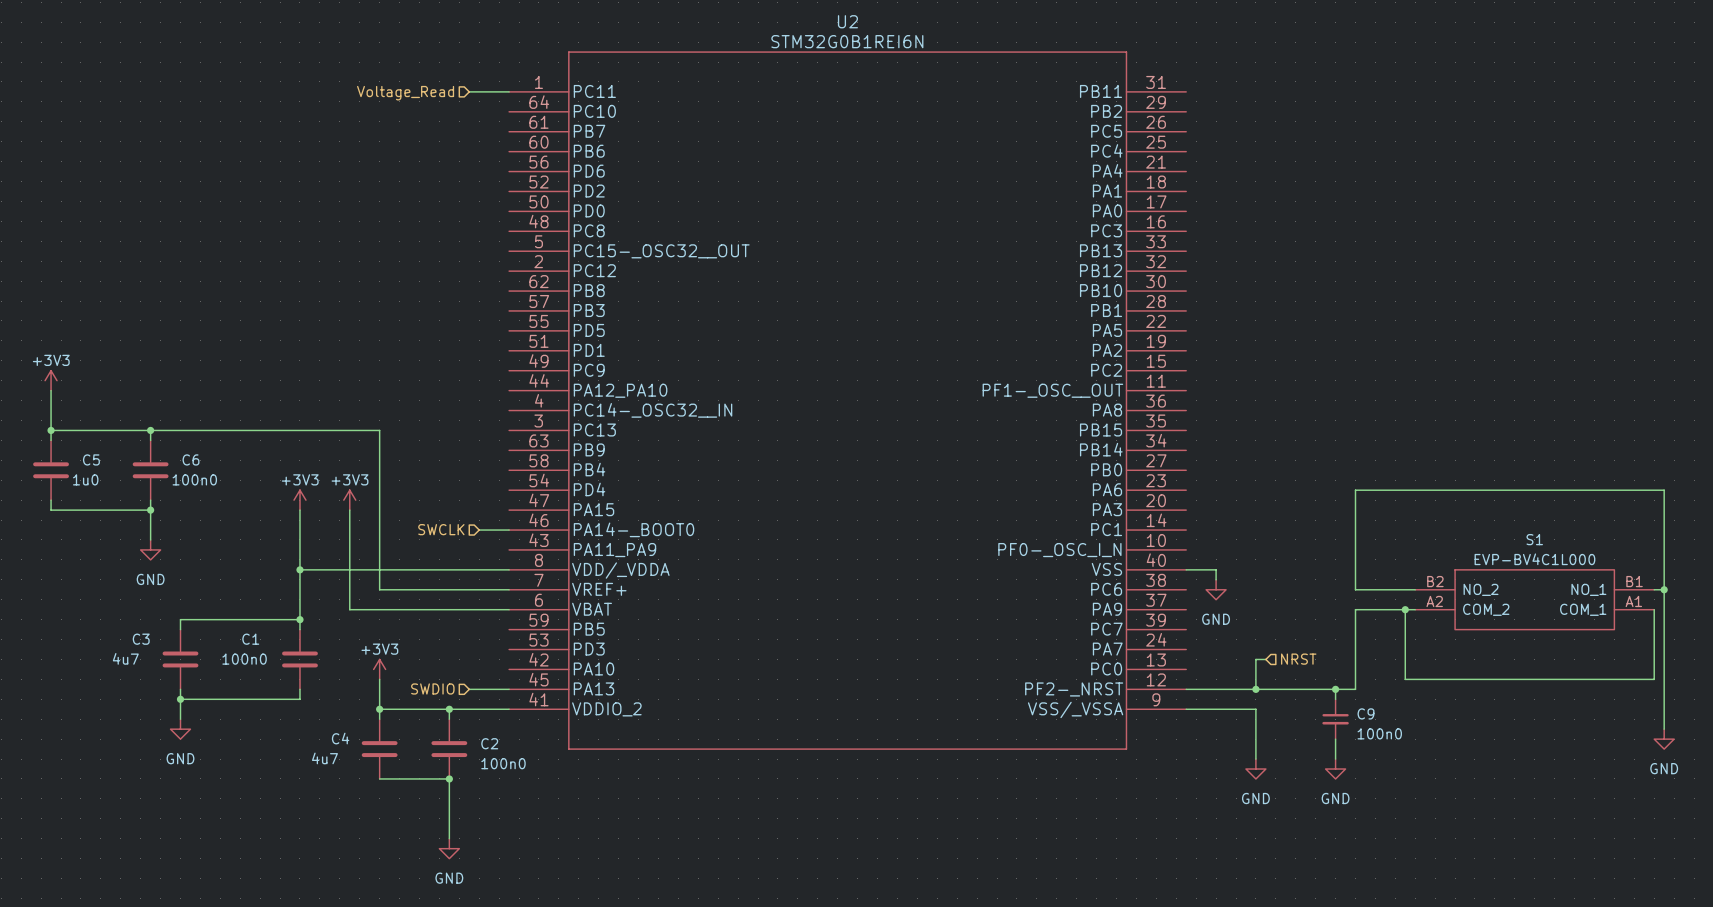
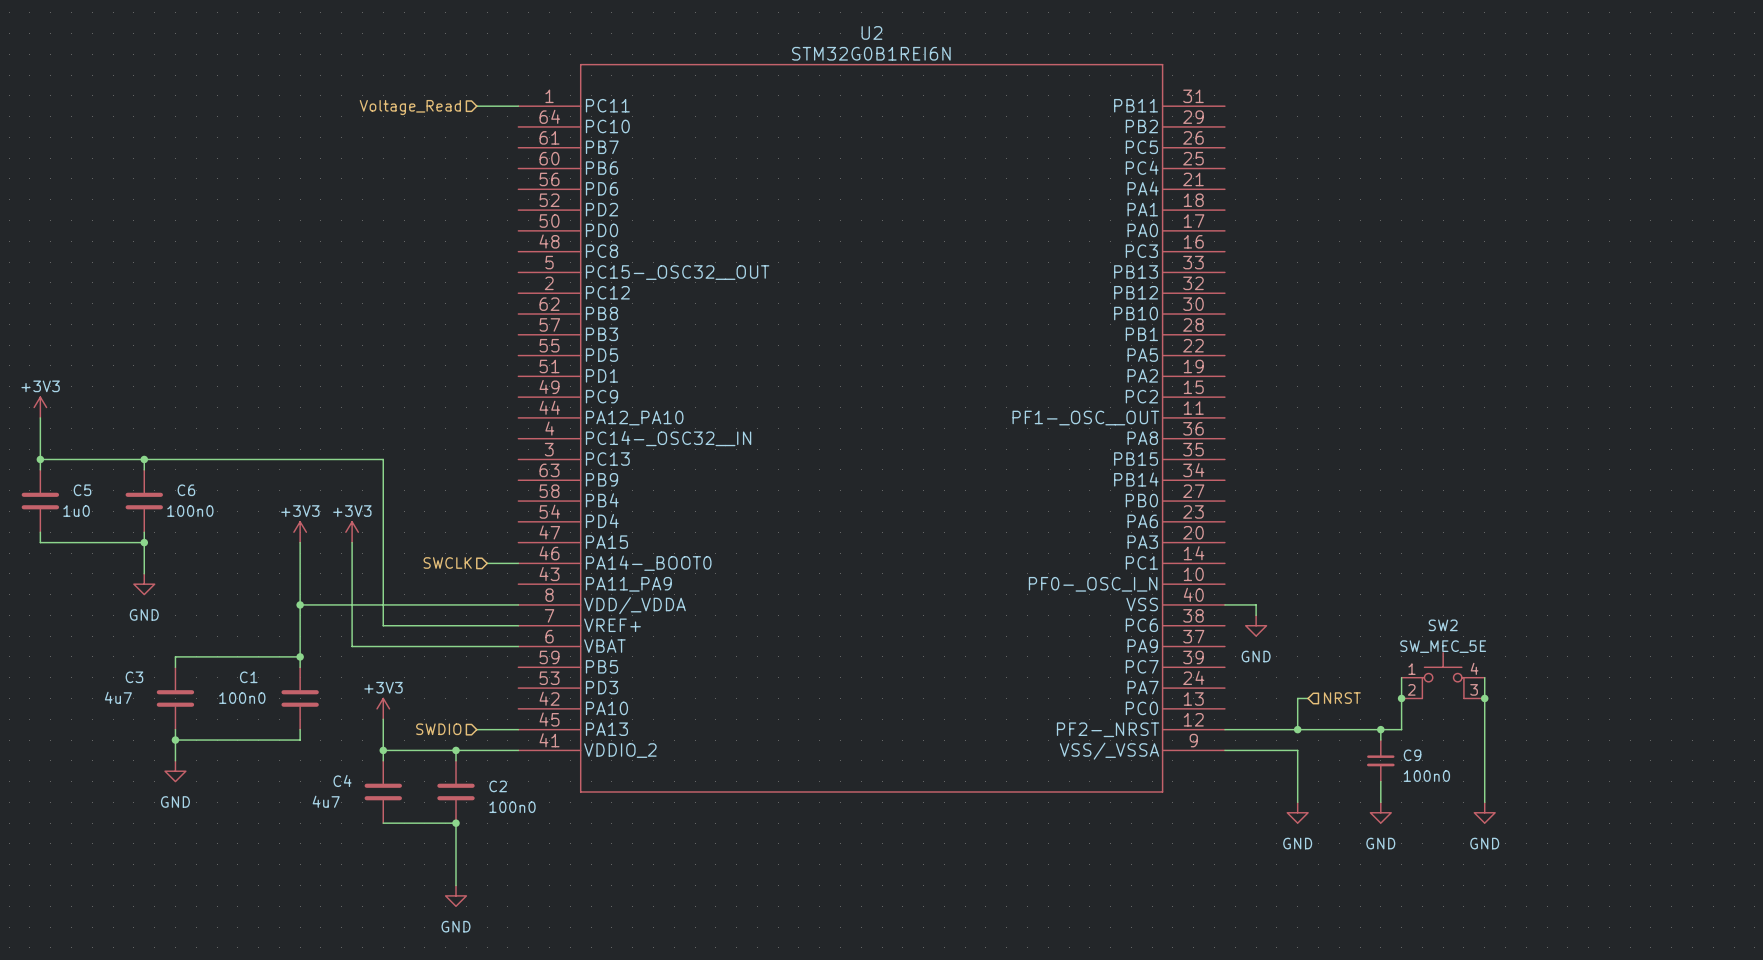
wire: (1415, 589) (1355, 589) (1355, 490) (1664, 490) (1664, 729) -> none
wire: (1654, 589) (1664, 589) -> none
junction: (1664, 589) -> none
S1: EVP-BV4C1L000 (1534, 599) -> none
wire: (1405, 609) (1405, 679) (1654, 679) (1654, 609) -> none
junction: (1405, 609) -> none
wire: (1415, 609) (1355, 609) (1355, 639) -> none
SW2: none -> SW_MEC_5E (1443, 675)
wire: none -> (1484, 677) (1484, 802)
junction: none -> (1401, 698)
junction: none -> (1484, 698)
power symbol: GND (1664, 739) -> none
power symbol: none -> GND (1484, 812)

